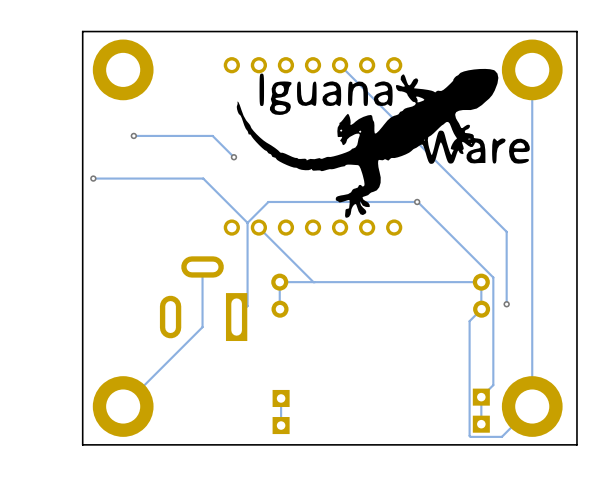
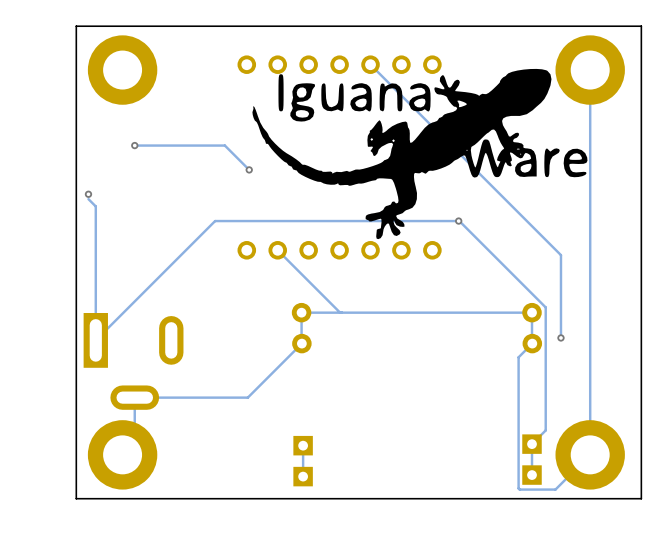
track: (93, 178) (203, 178) (247, 222) -> none
track: (268, 201) (247, 222) -> (288, 221) (215, 221) (95, 340) (95, 206) (88, 199)
track: (247, 222) (247, 306) (236, 317) -> none
track: (202, 266) (202, 327) (133, 395) -> (301, 343) (247, 397) (134, 397) (134, 442)
part rotation: 0° (203, 298) -> 180° (133, 361)
part position: (203, 298) -> (133, 361)

